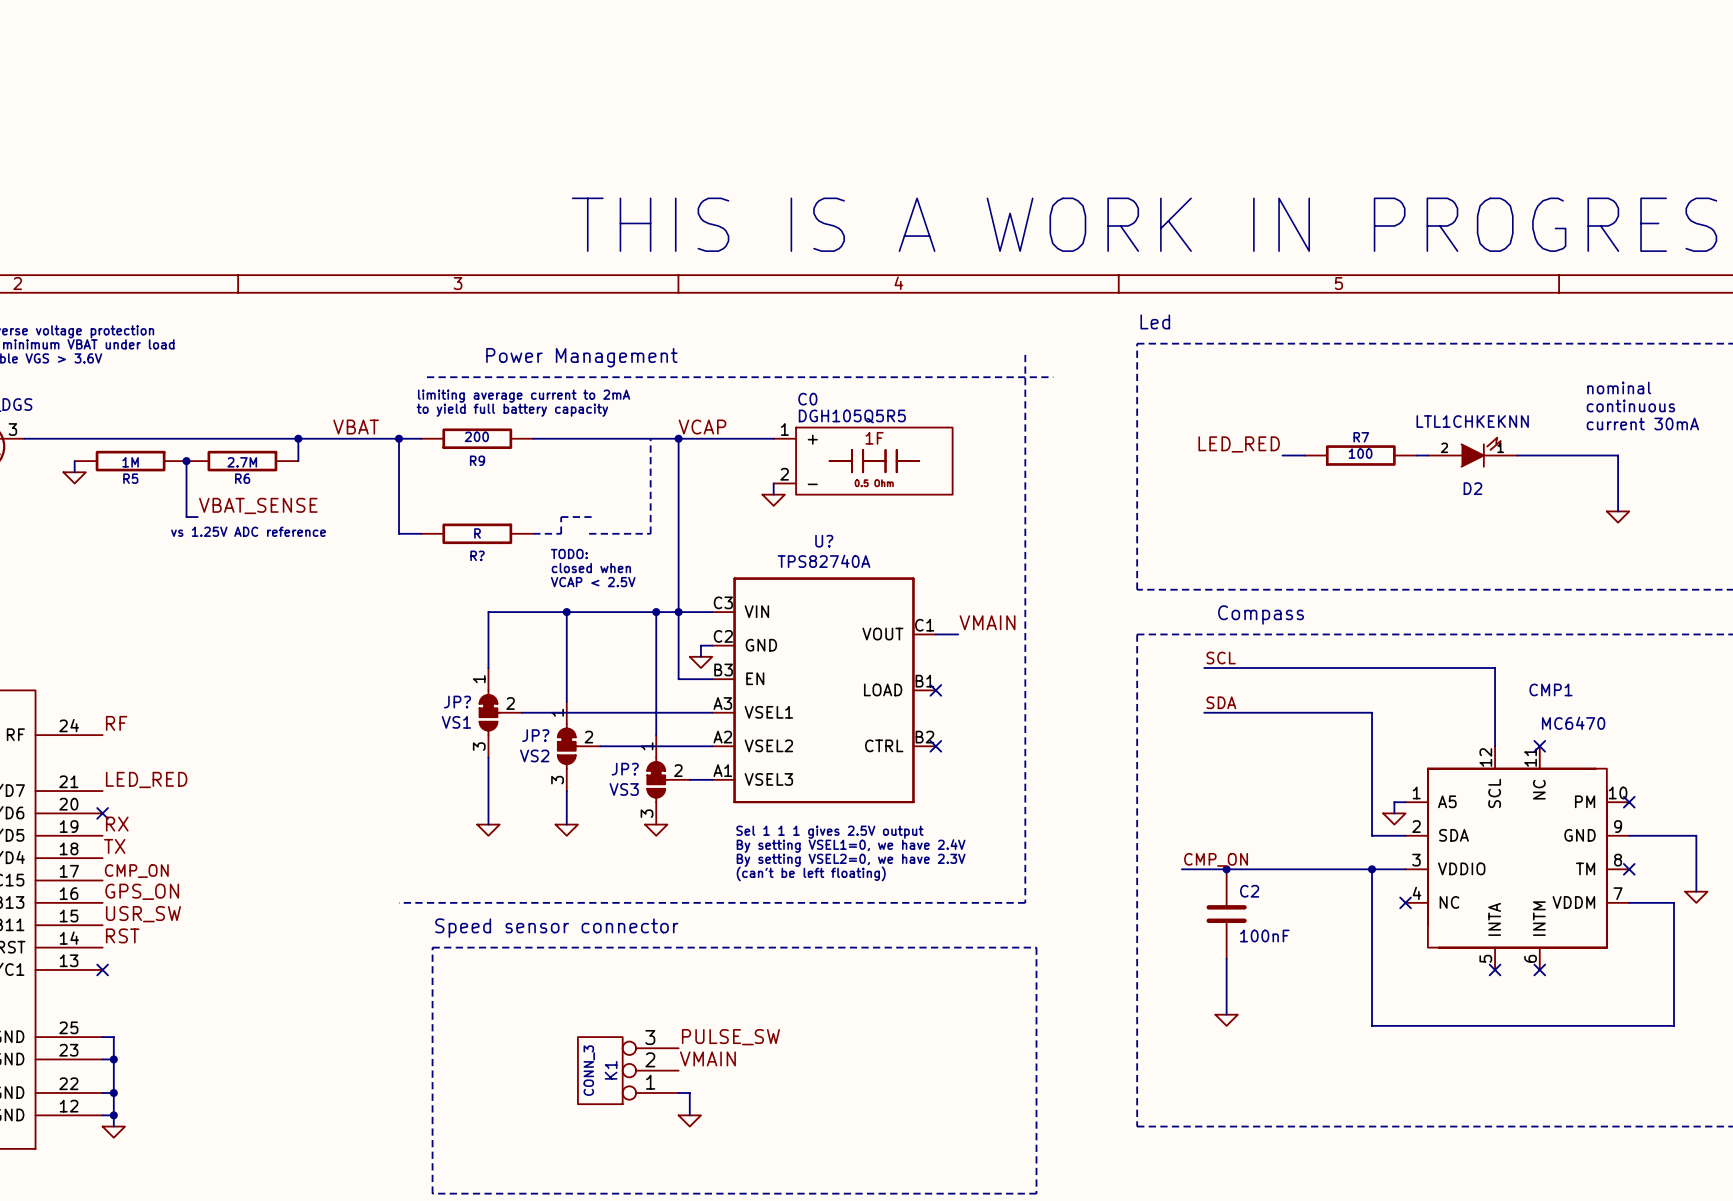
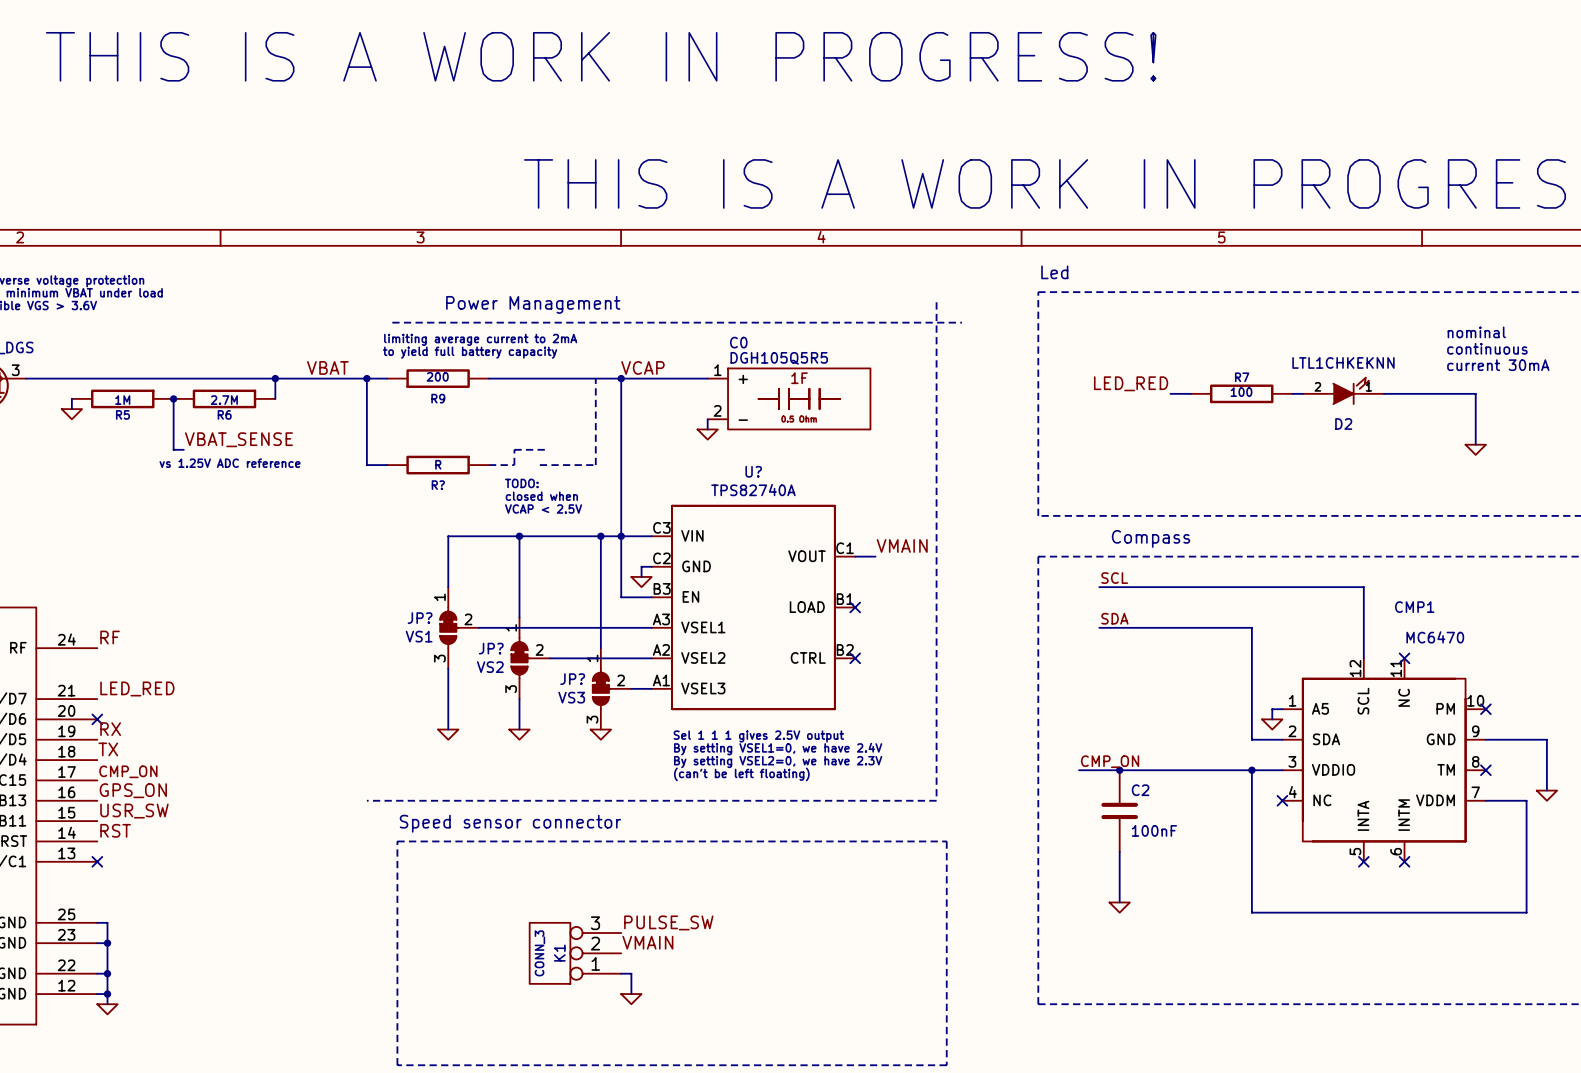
text: none -> THIS IS A WORK IN PROGRESS! (601, 56)

